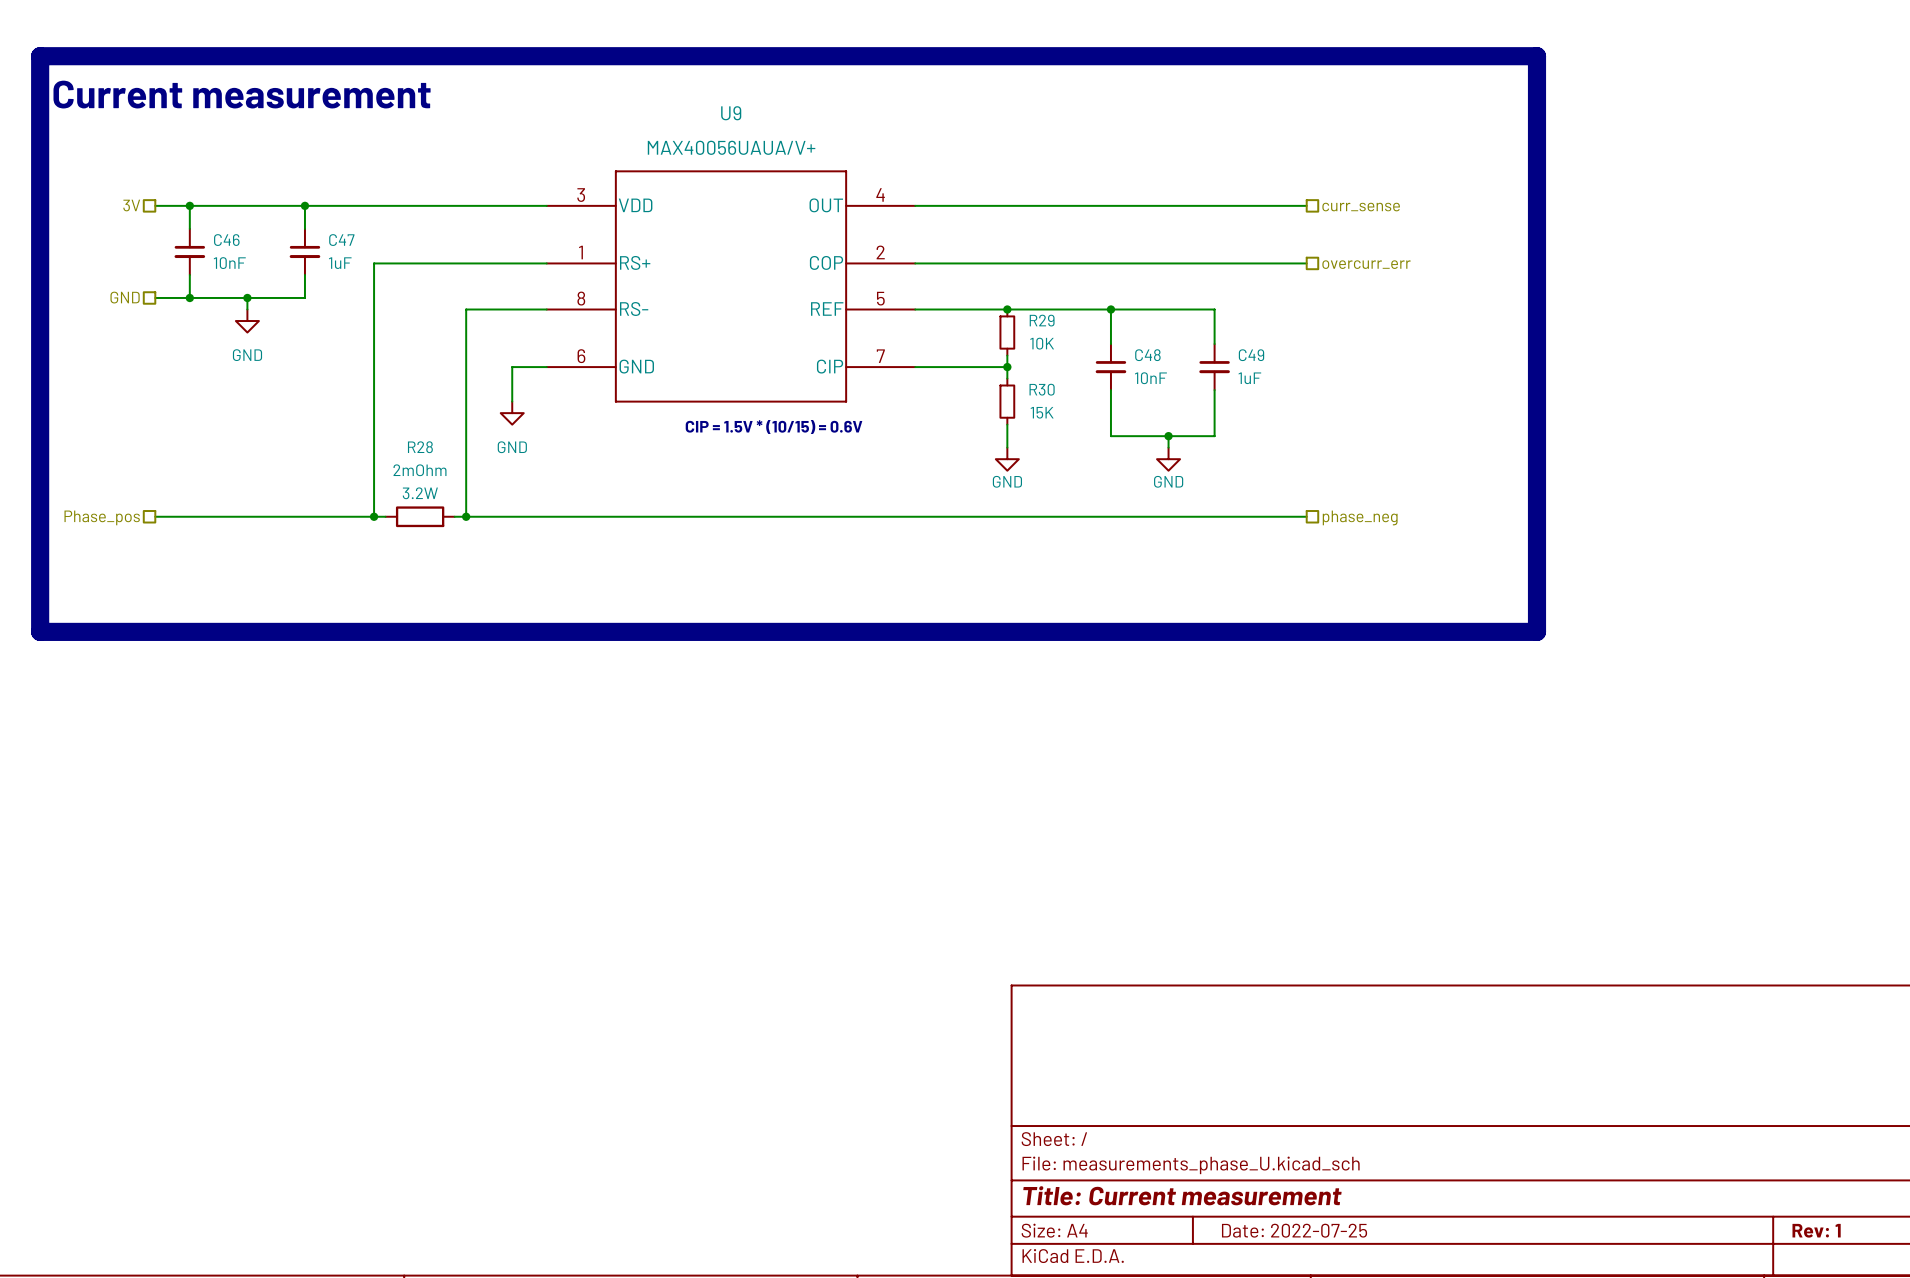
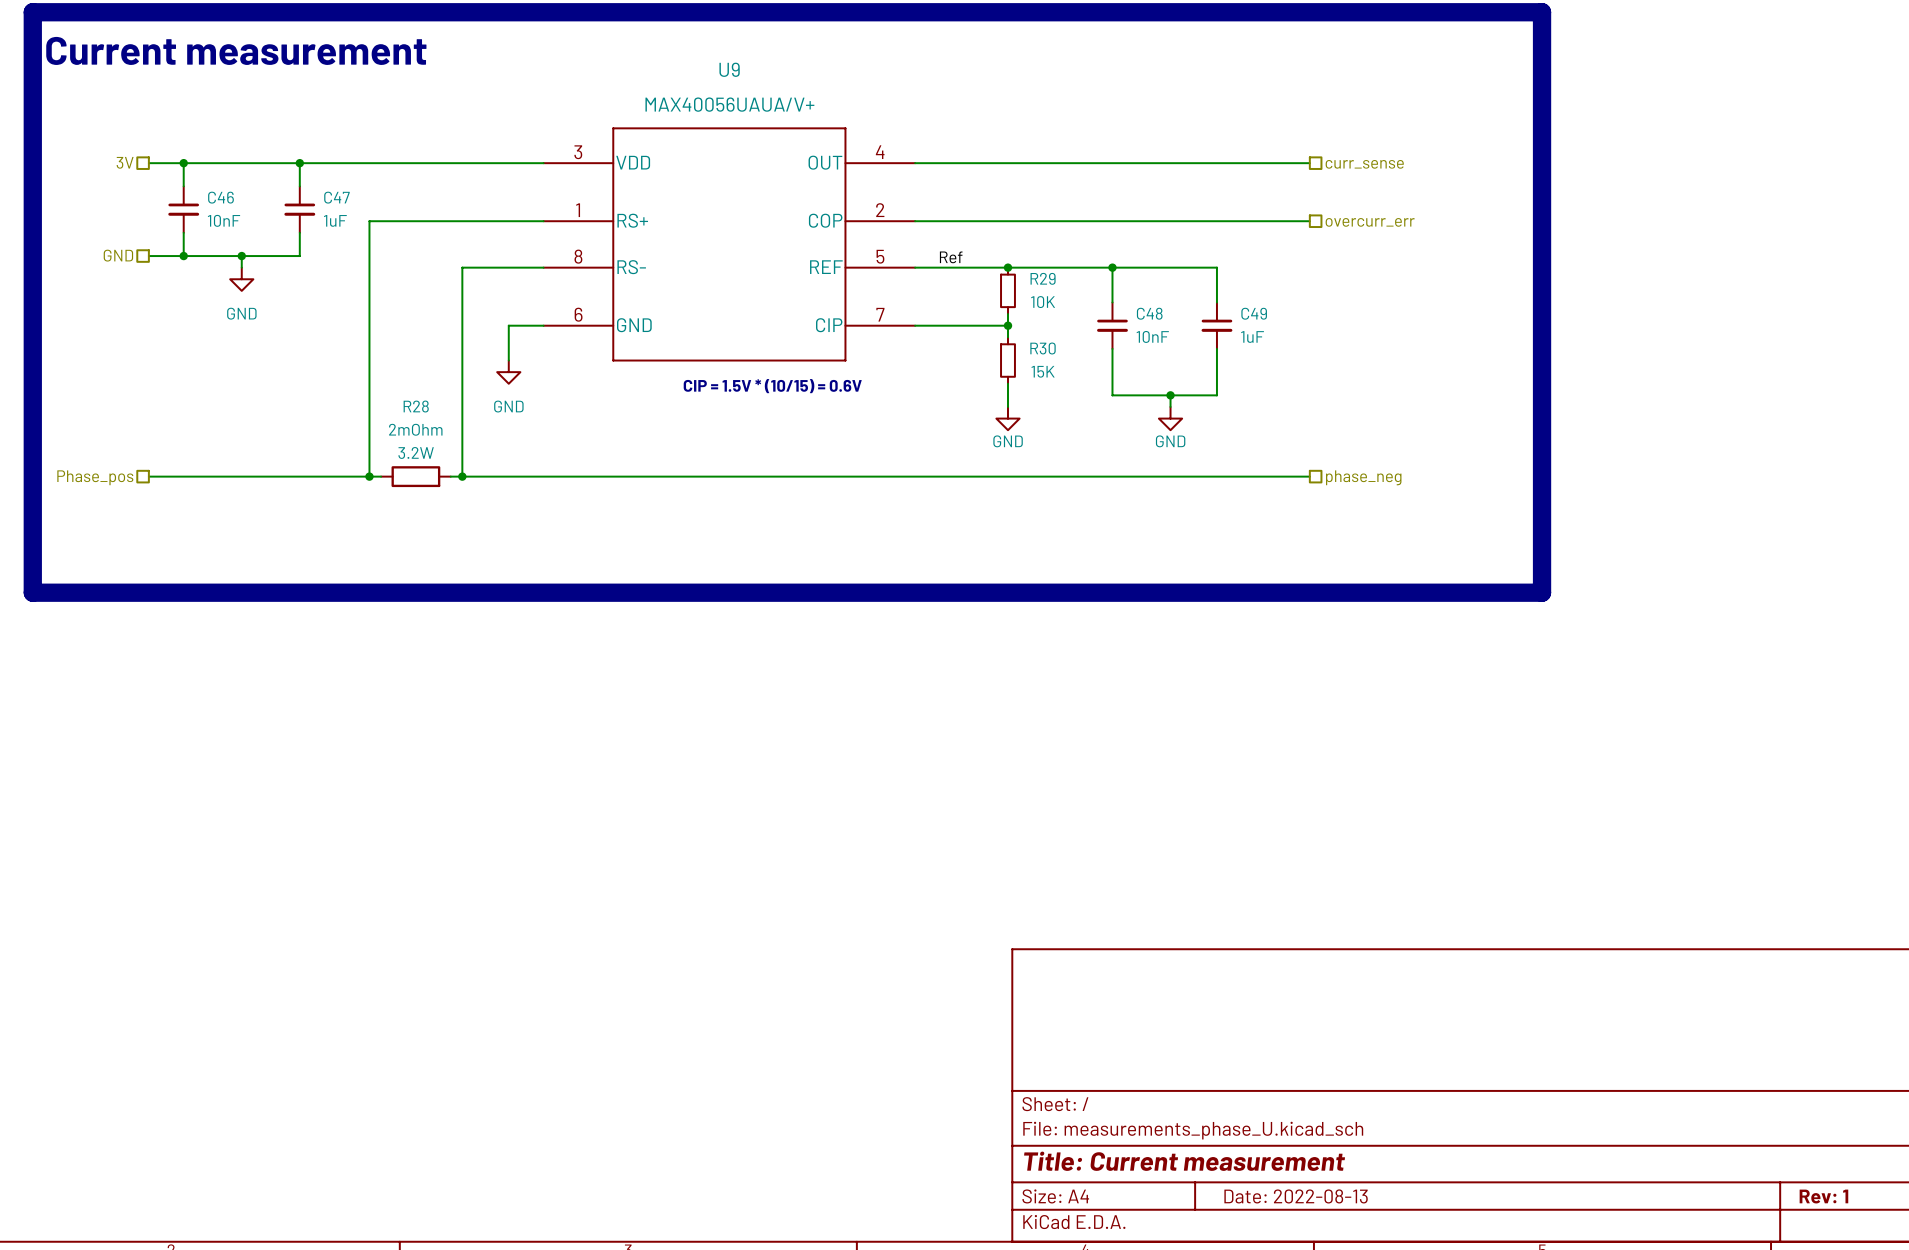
label: none -> Ref (951, 257)
title block: Date: 2022-07-25 (1294, 1230) -> Date: 2022-08-13 (1296, 1196)

